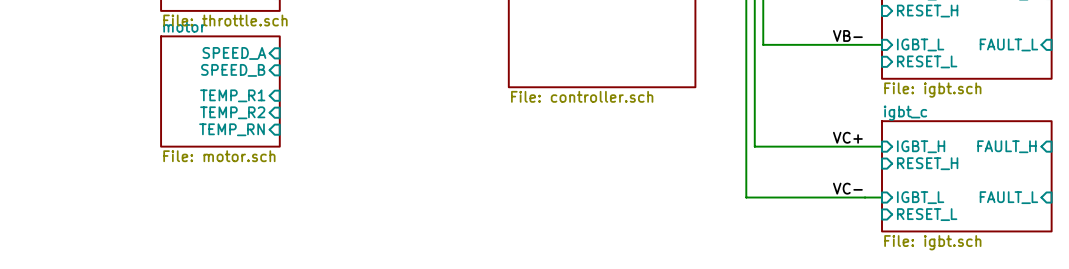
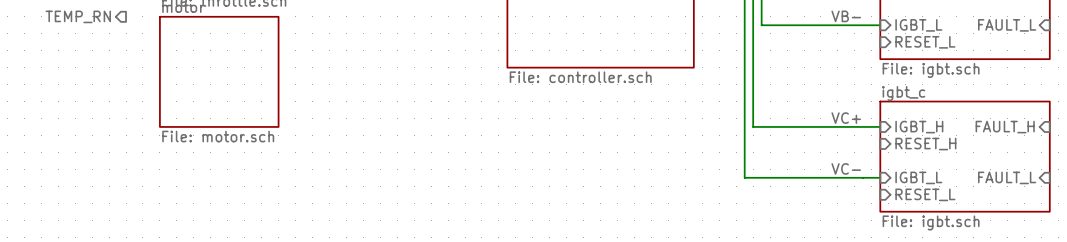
sheet pin: none -> TEMP_RN (78, 16)
sheet pin: SPEED_A (234, 53) -> none
sheet pin: SPEED_B (233, 70) -> none
sheet pin: TEMP_R1 (232, 95) -> none
sheet pin: TEMP_R2 (232, 112) -> none
sheet pin: TEMP_RN (232, 129) -> none

